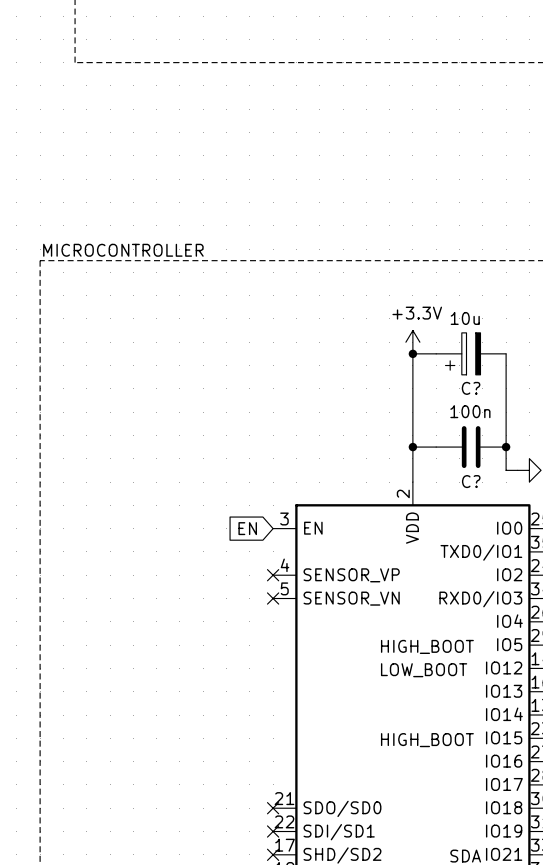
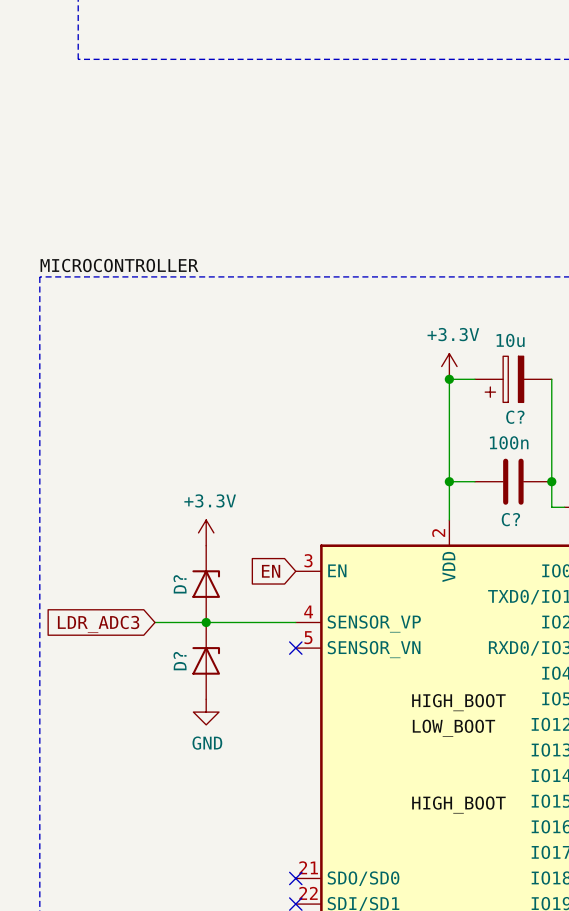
power symbol: none -> +3.3V (206, 532)
D?: none -> (206, 584)
global label: none -> LDR_ADC3 (98, 624)
wire: none -> (155, 622) (295, 622)
junction: none -> (206, 622)
no-connect mark: (273, 575) -> none
D?: none -> (206, 660)
power symbol: none -> GND (206, 712)

